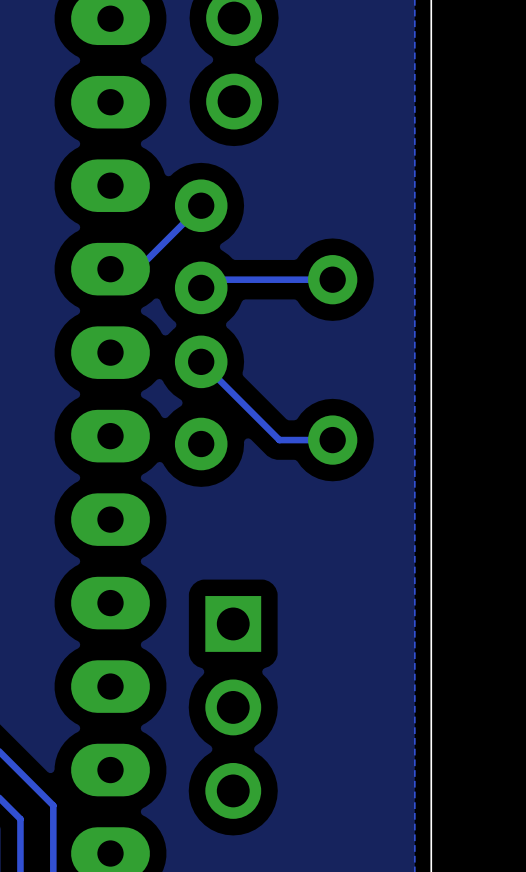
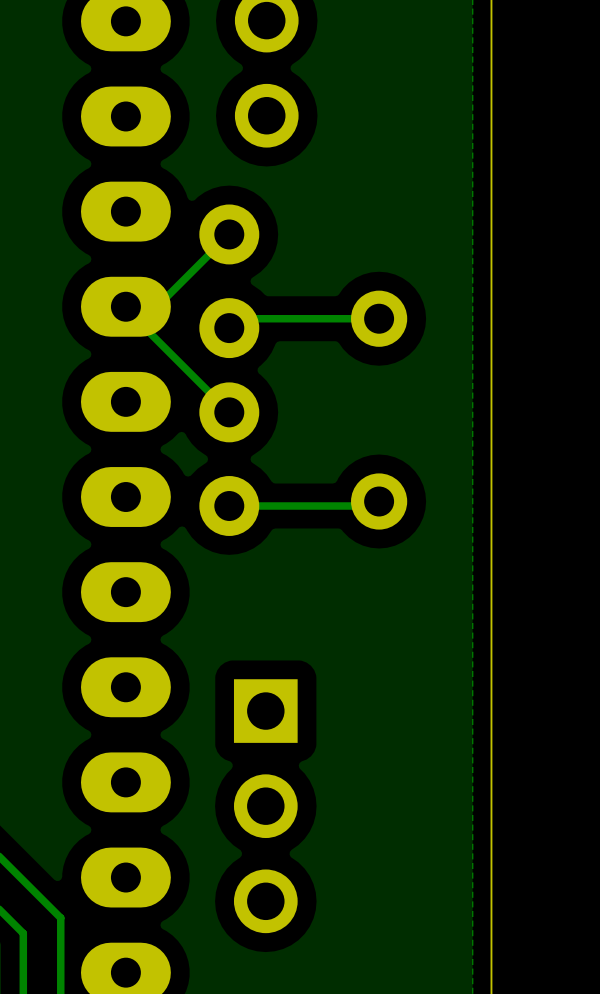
track: none -> (125, 308) (229, 412)
track: (209, 369) (279, 440) (332, 440) -> none
track: none -> (374, 505) (229, 505)

